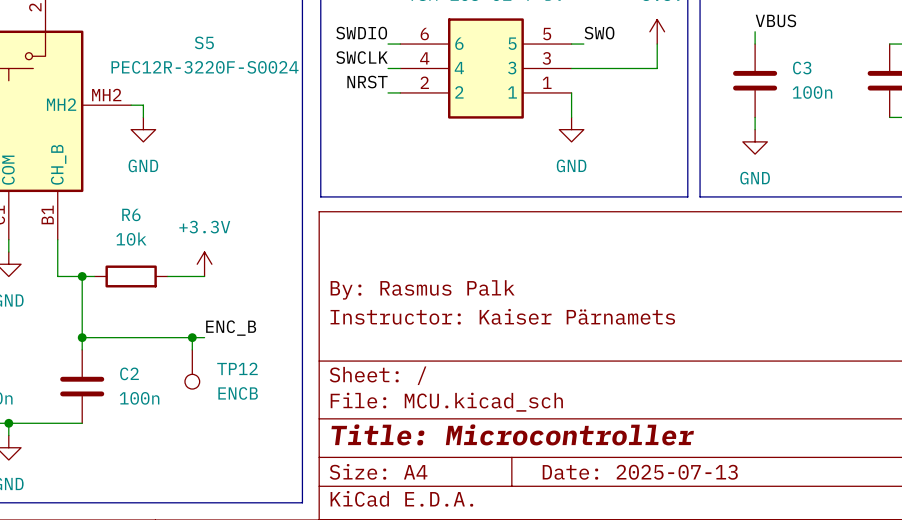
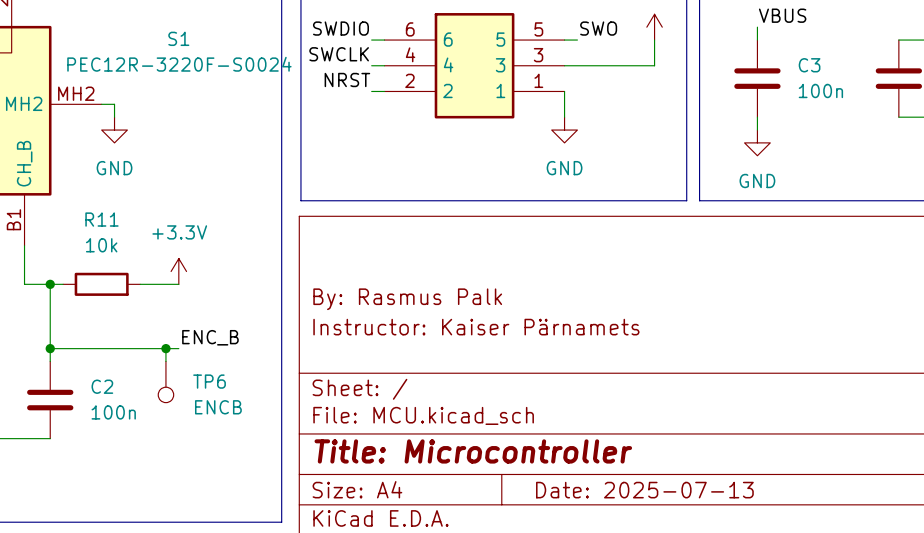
S5 name: S5 (204, 42) -> S1 (178, 38)
R6 name: R6 (131, 214) -> R11 (101, 219)
TP12 name: TP12 (237, 368) -> TP6 (209, 381)

